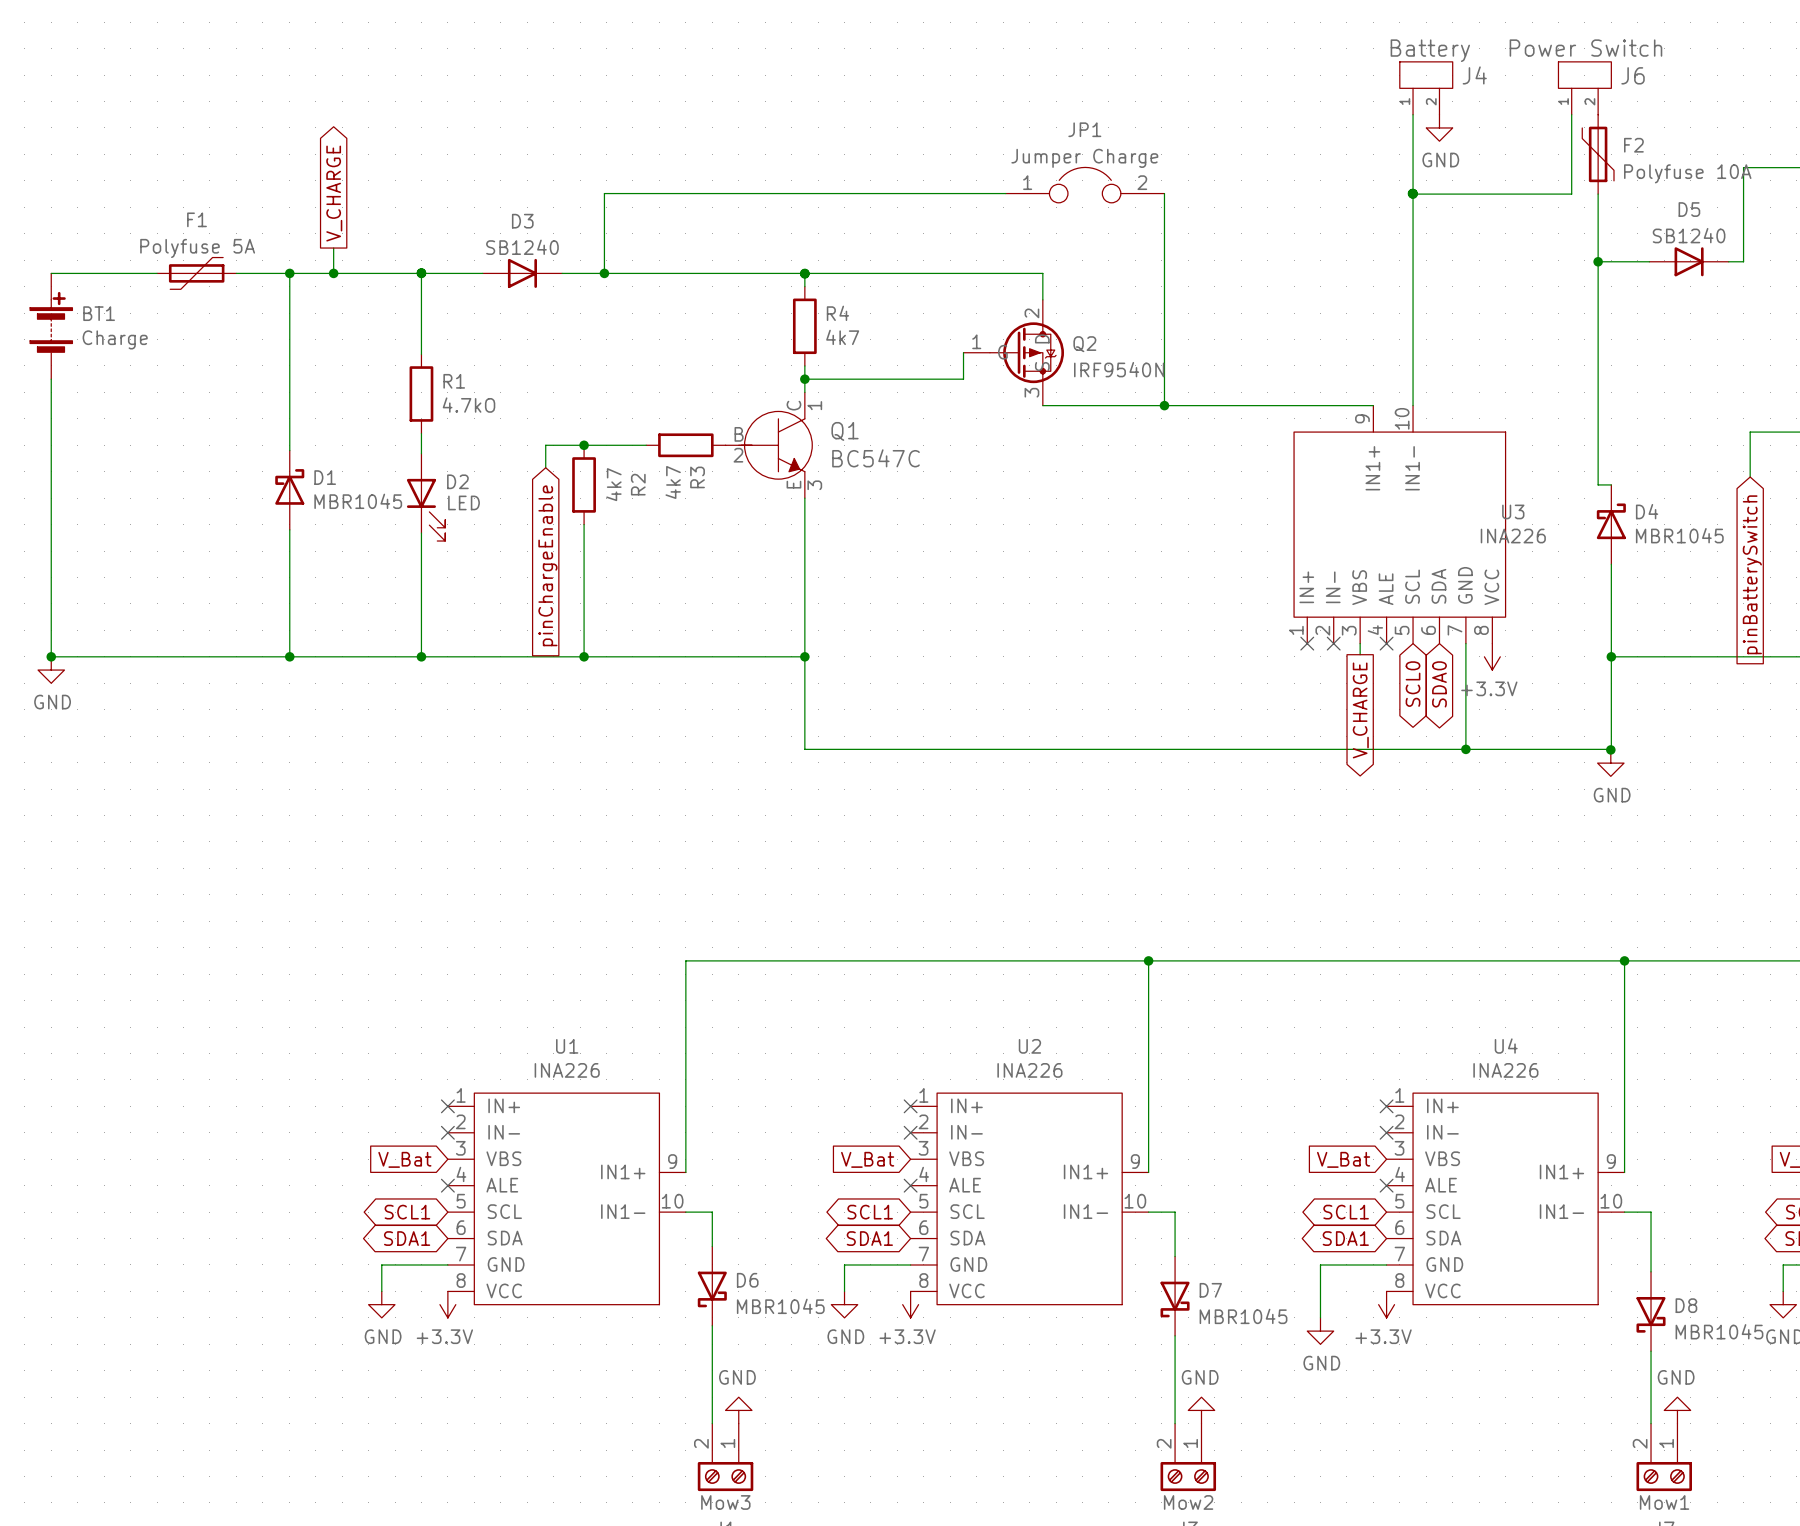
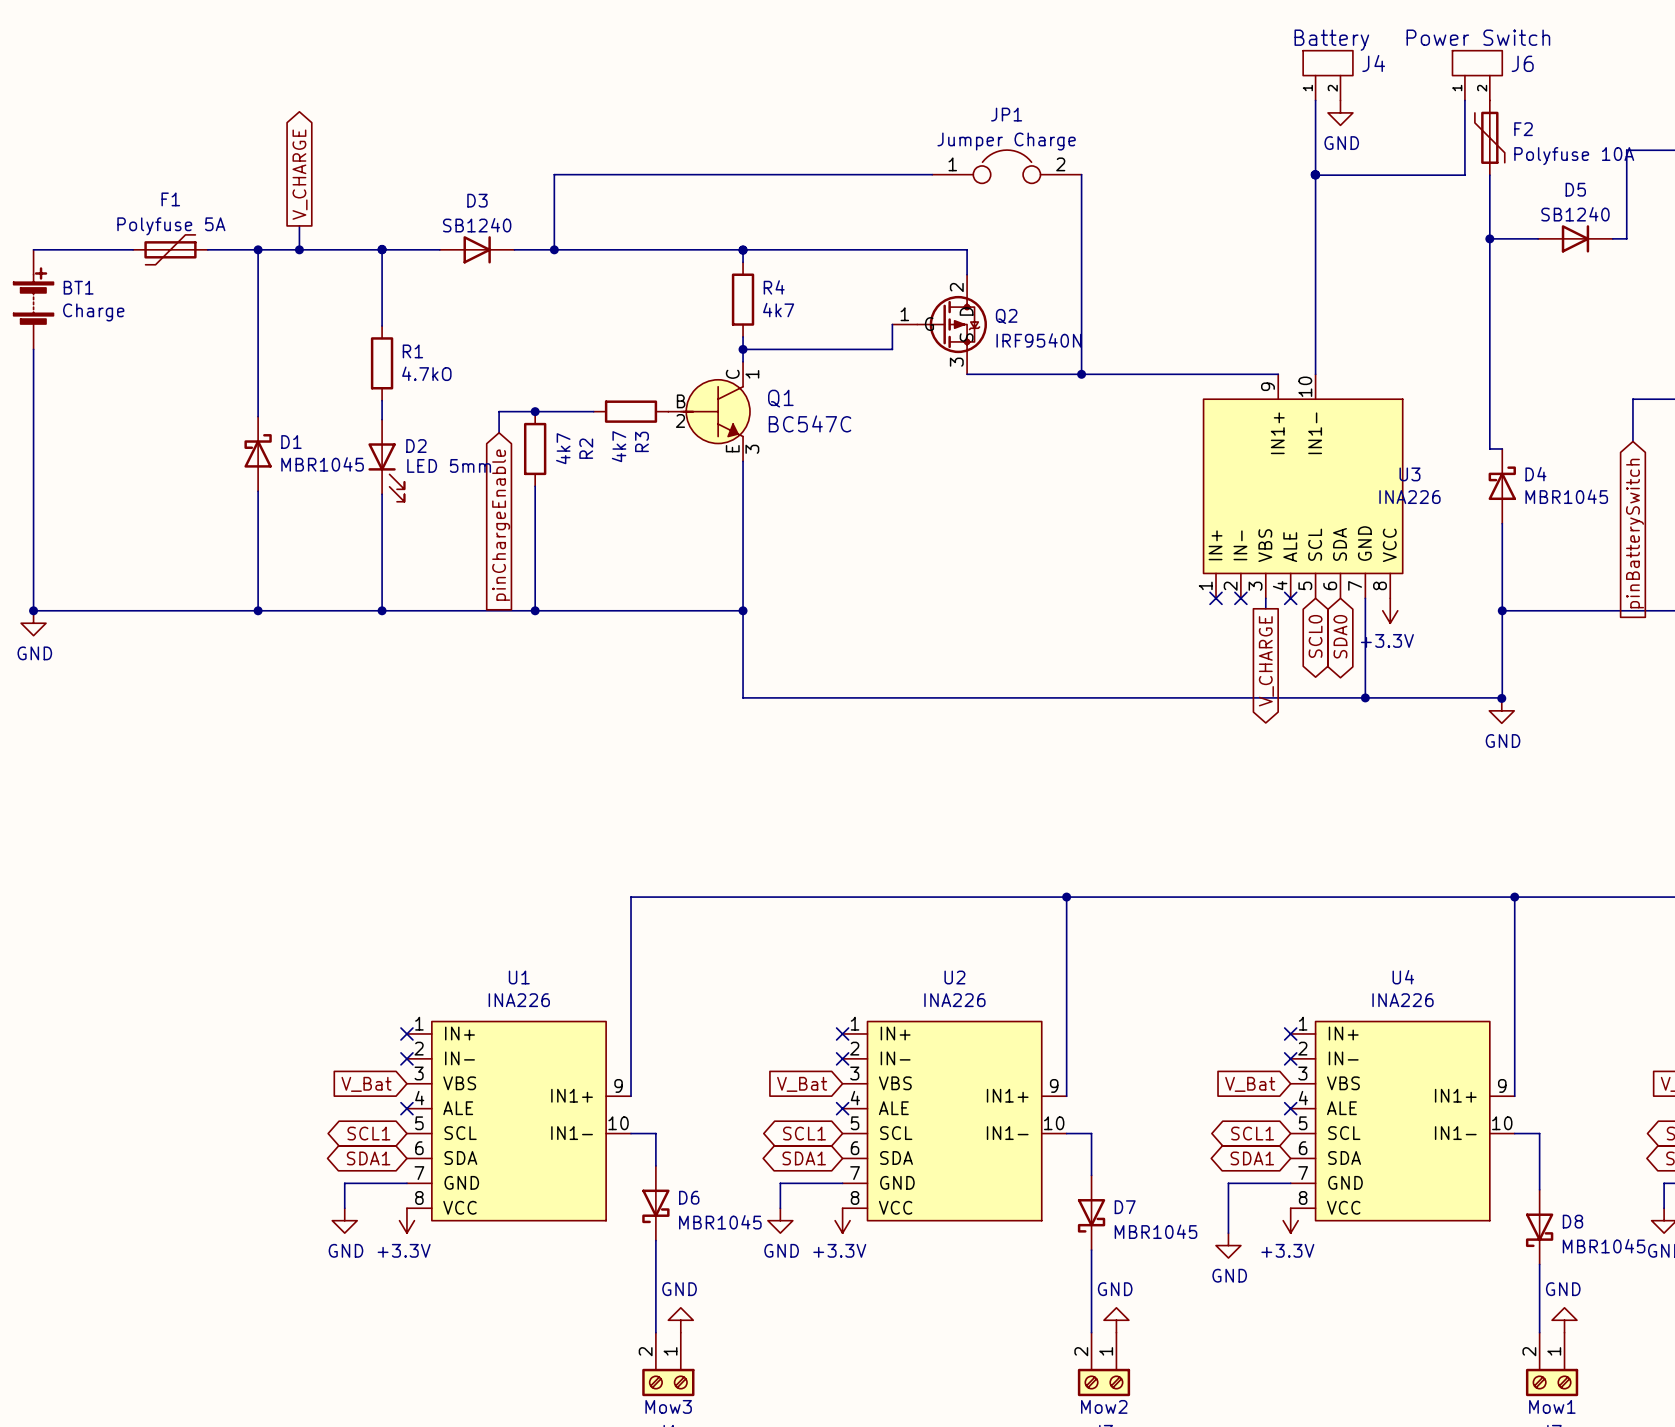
D2 value: LED (464, 502) -> LED 5mm (449, 465)

